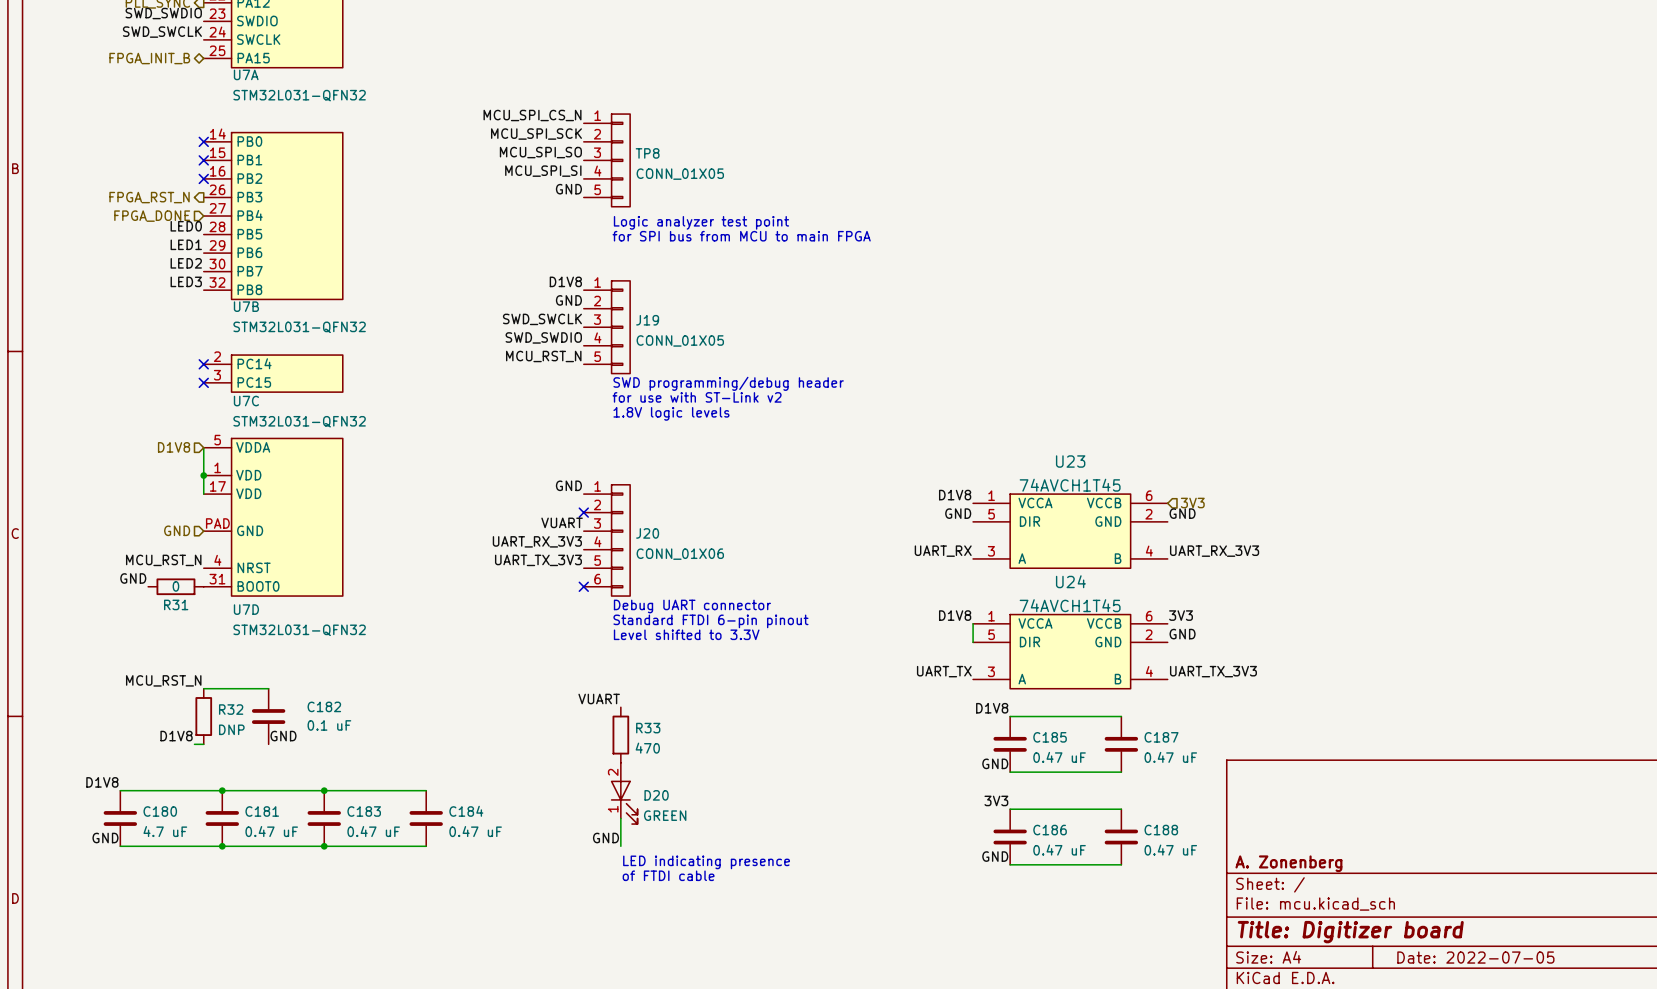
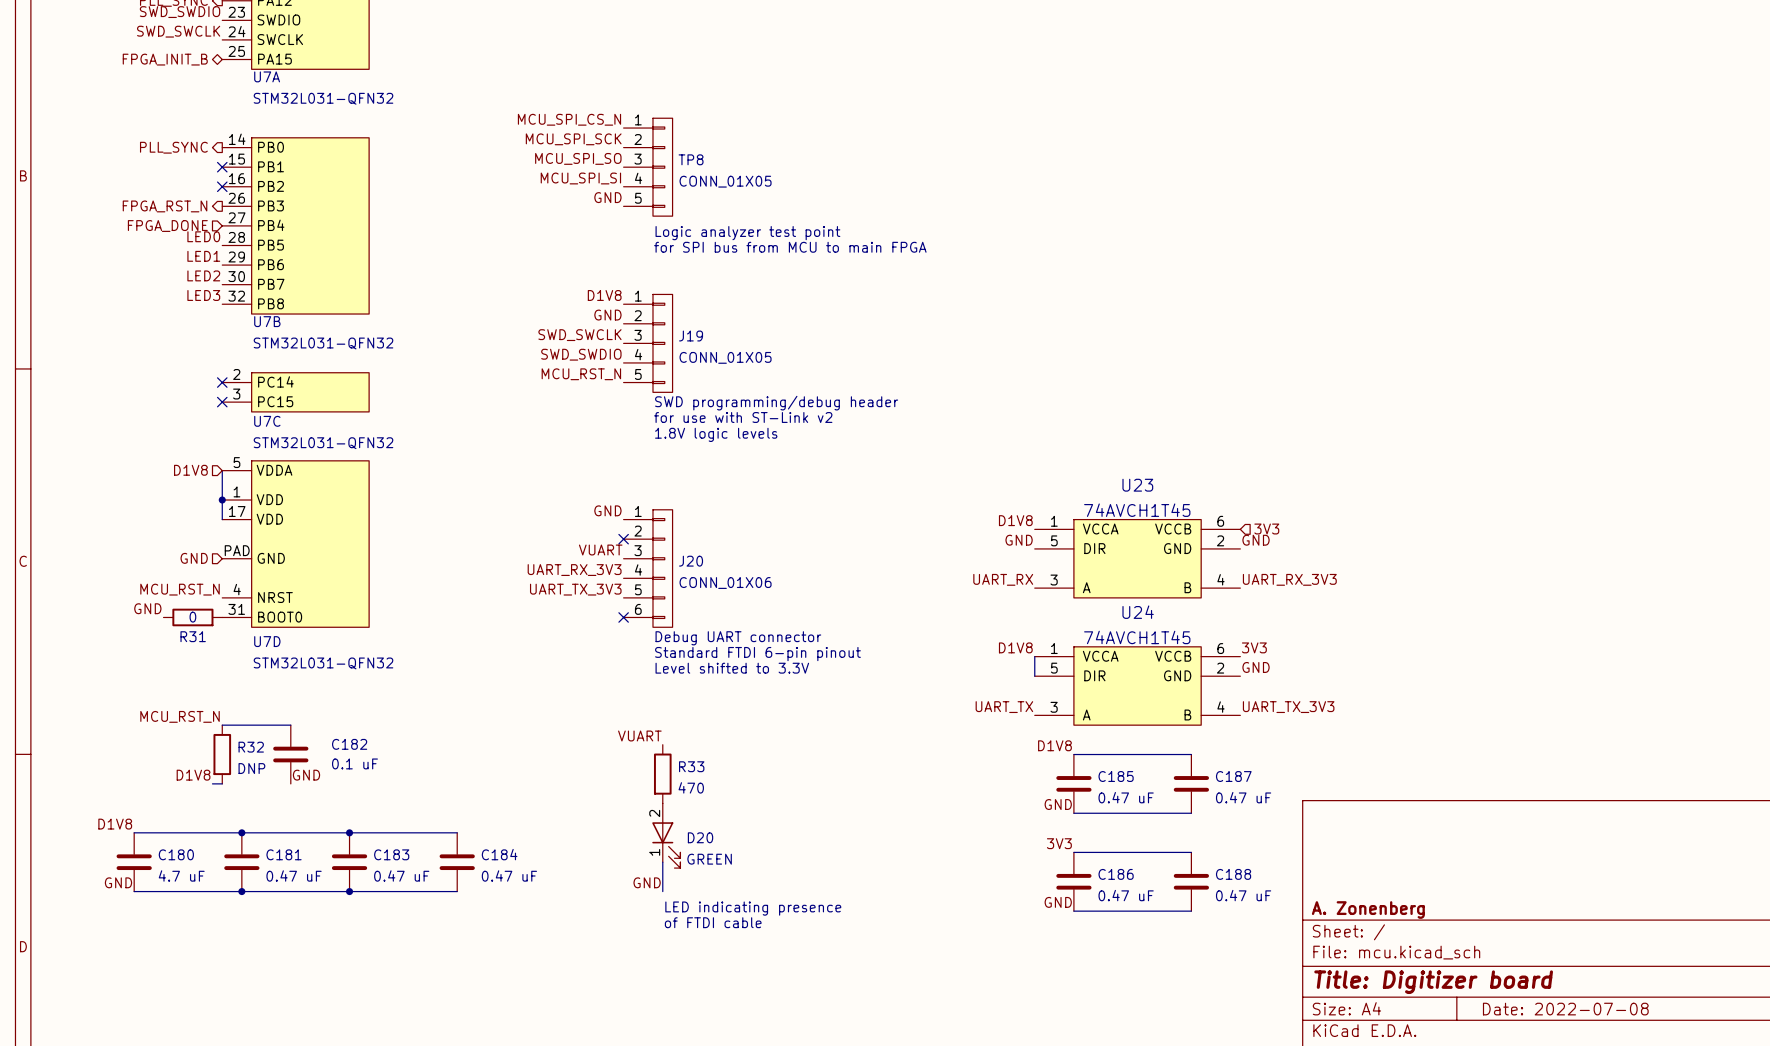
hierarchical label: none -> PLL_SYNC (173, 147)
no-connect mark: (203, 141) -> none
title block: Date: 2022-07-05 (1475, 957) -> Date: 2022-07-08 (1565, 1009)

